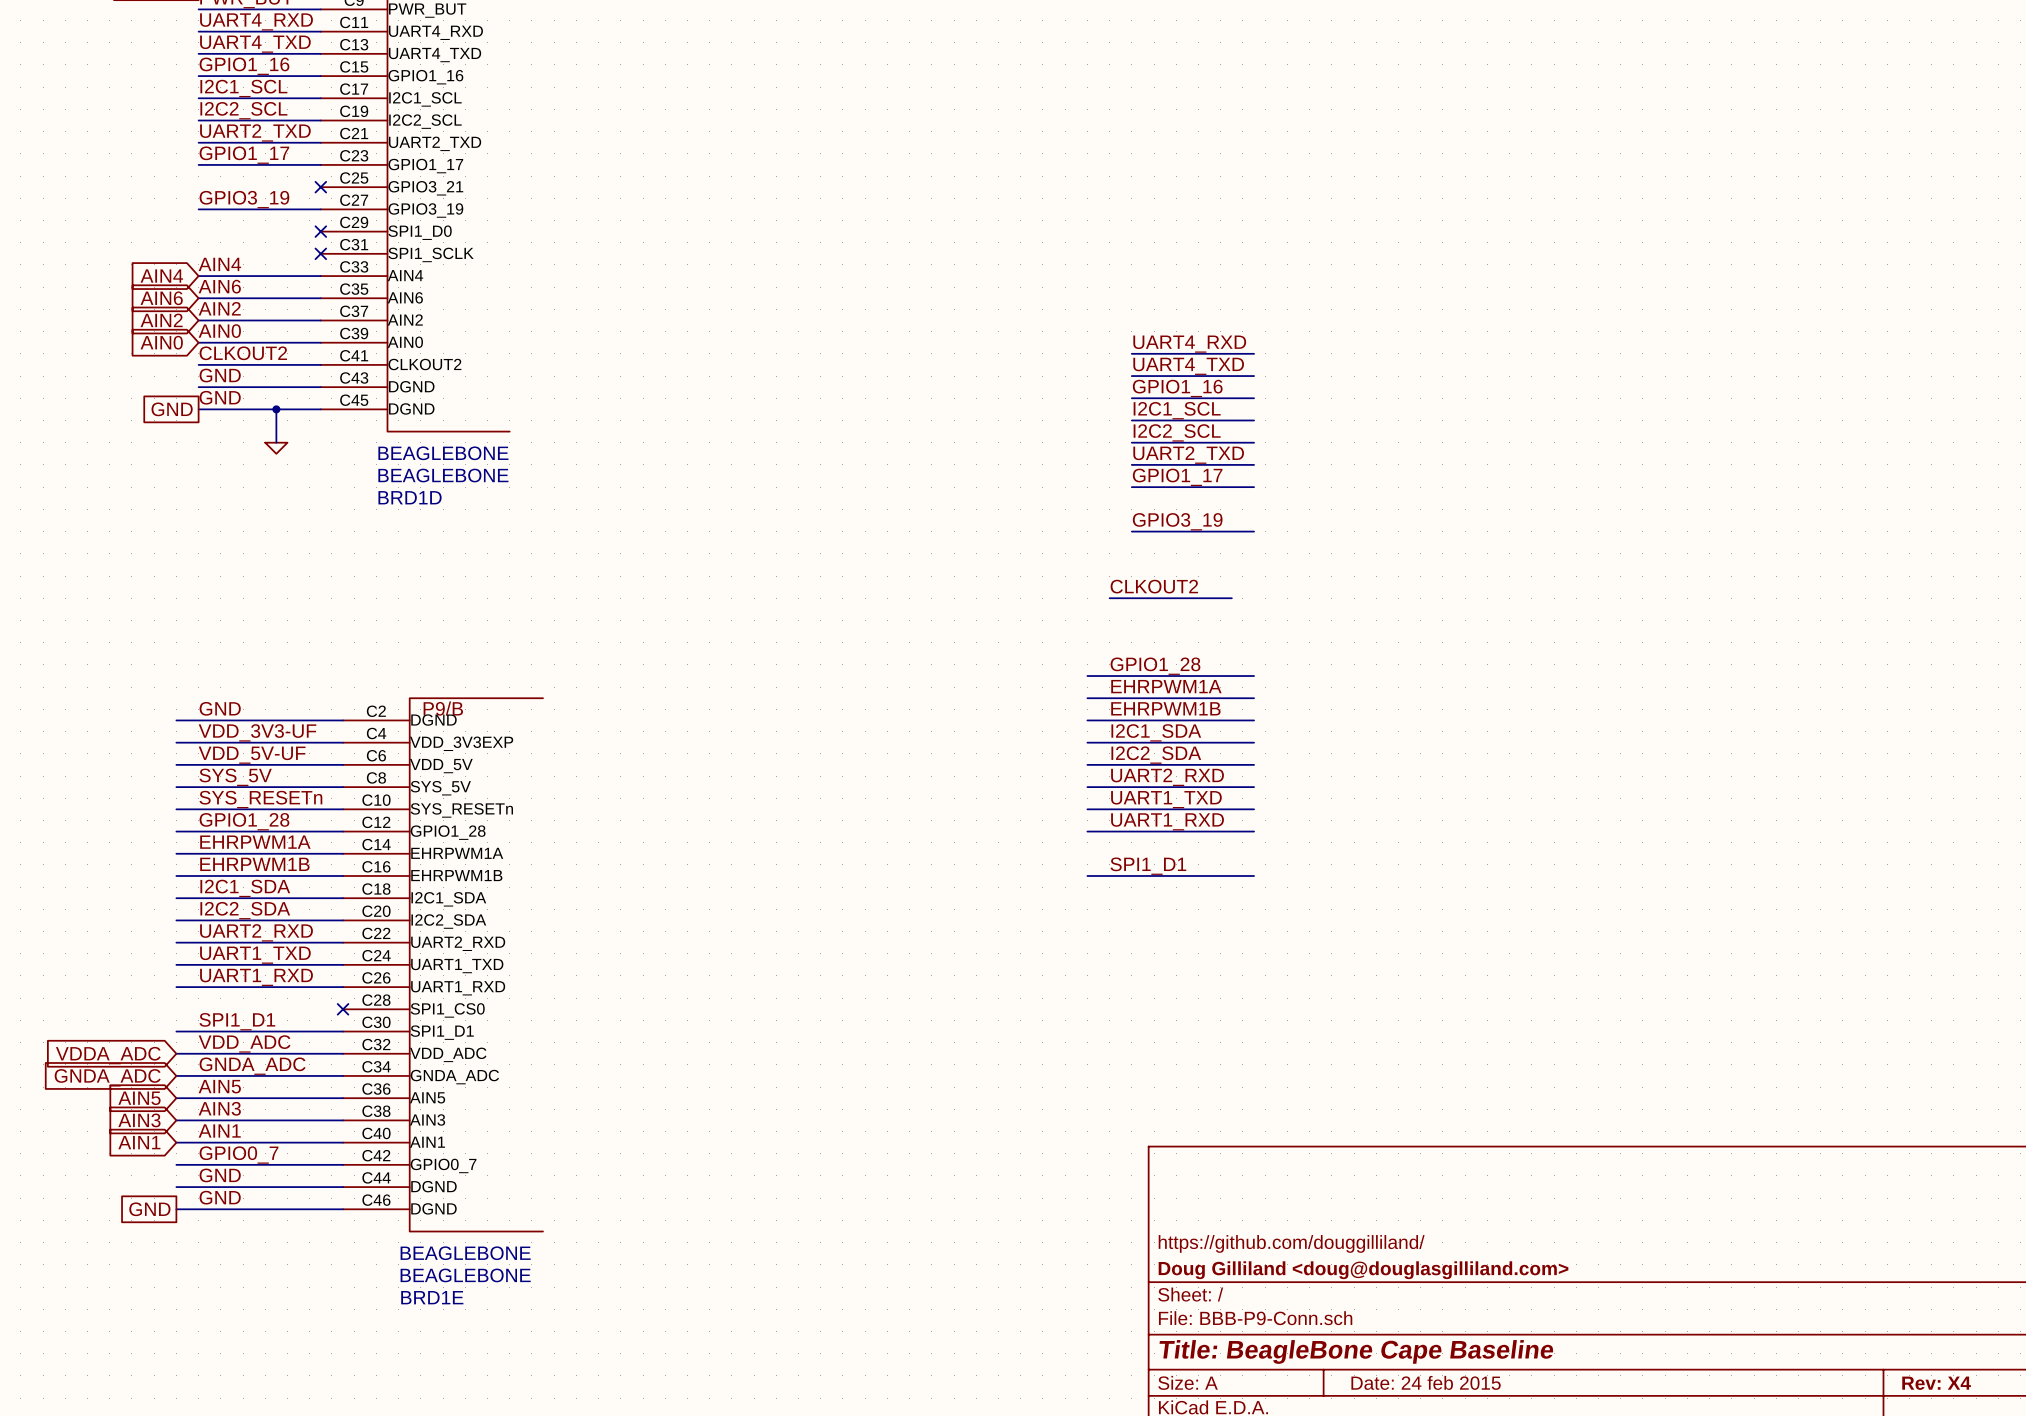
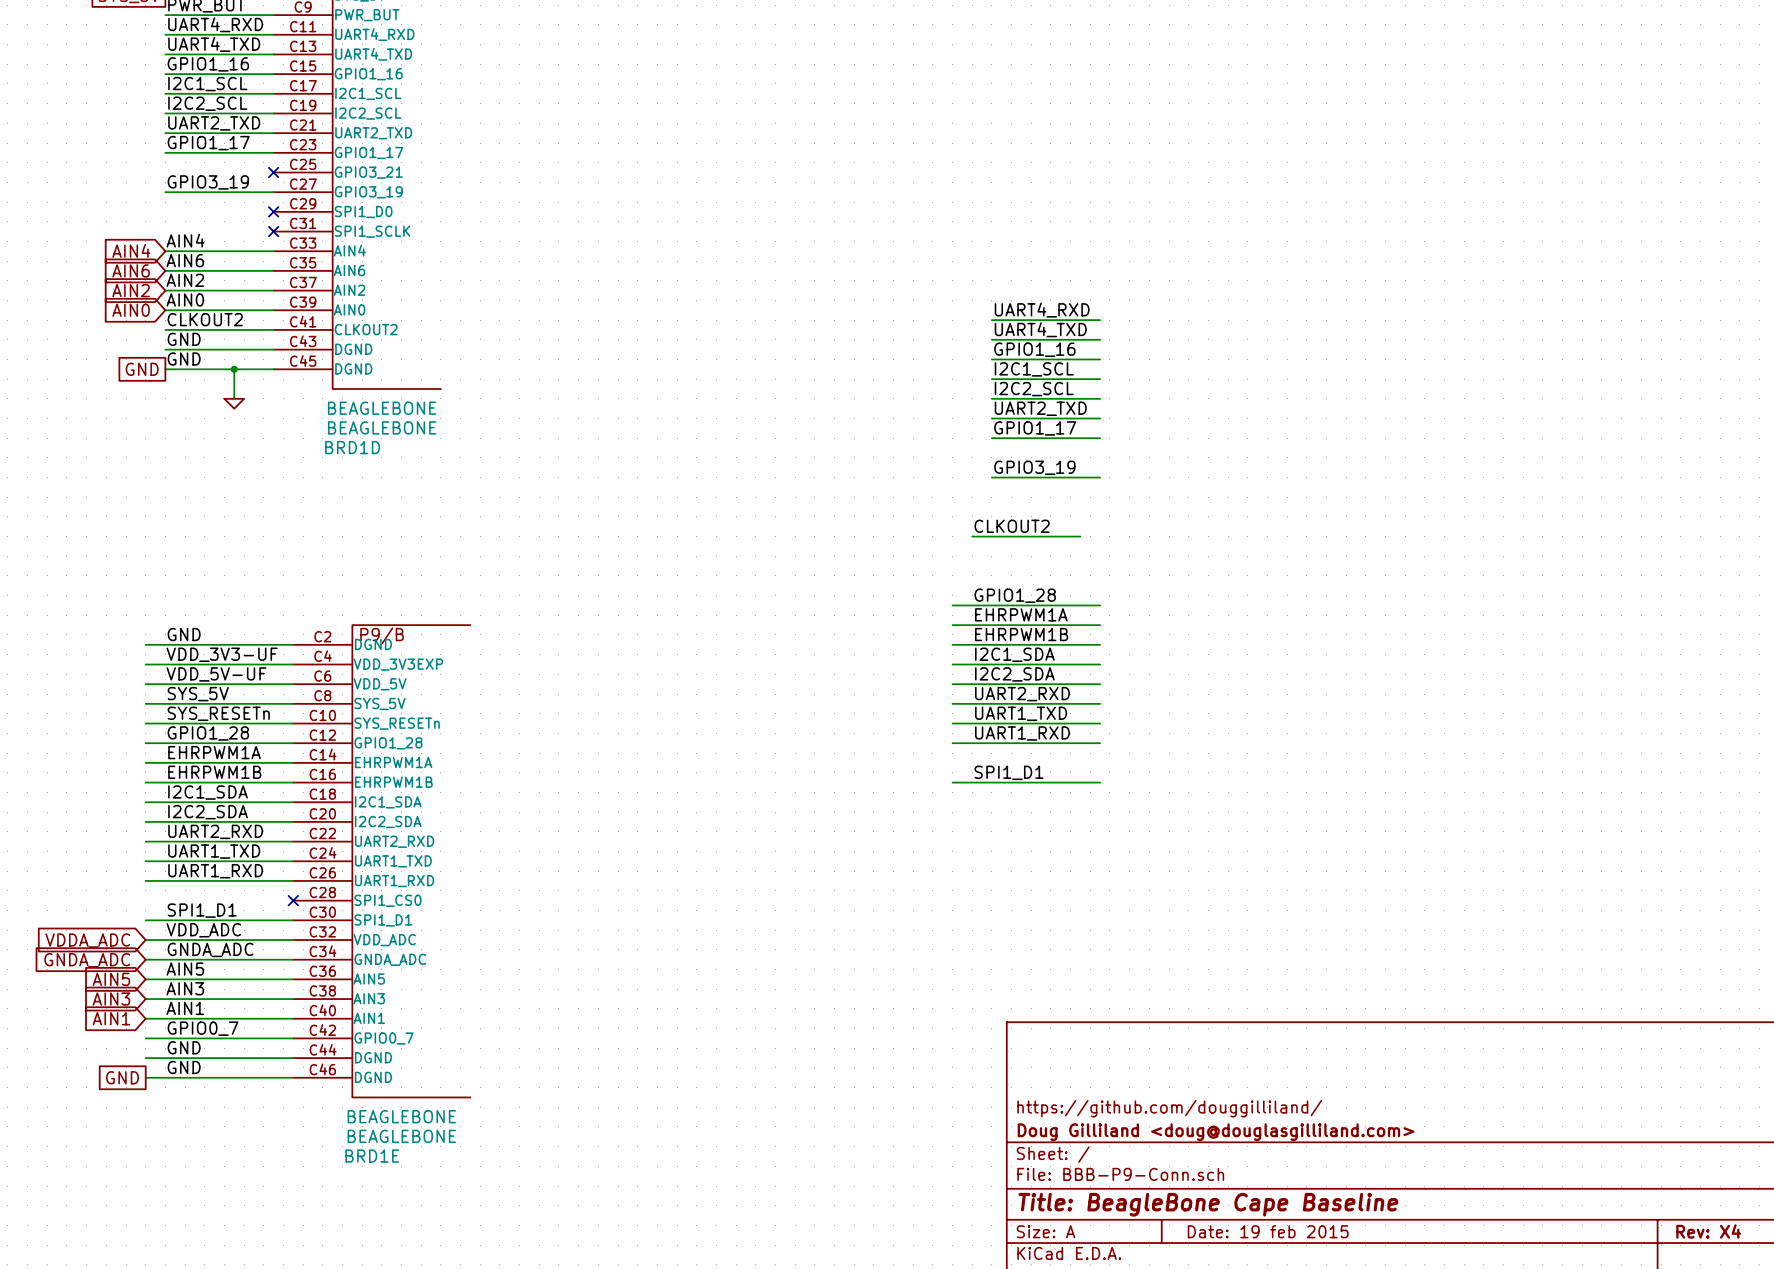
title block: Date: 24 feb 2015 (1426, 1382) -> Date: 19 feb 2015 (1268, 1231)

